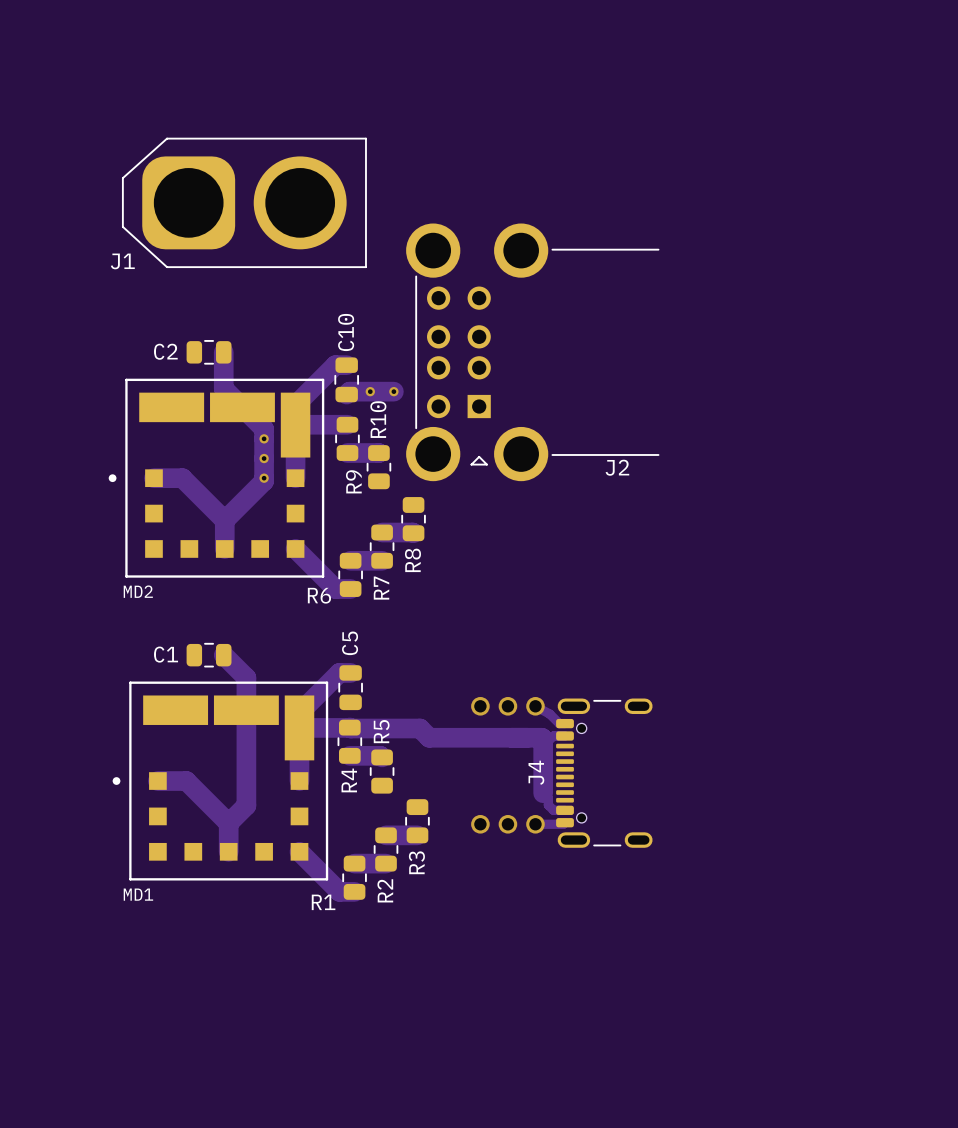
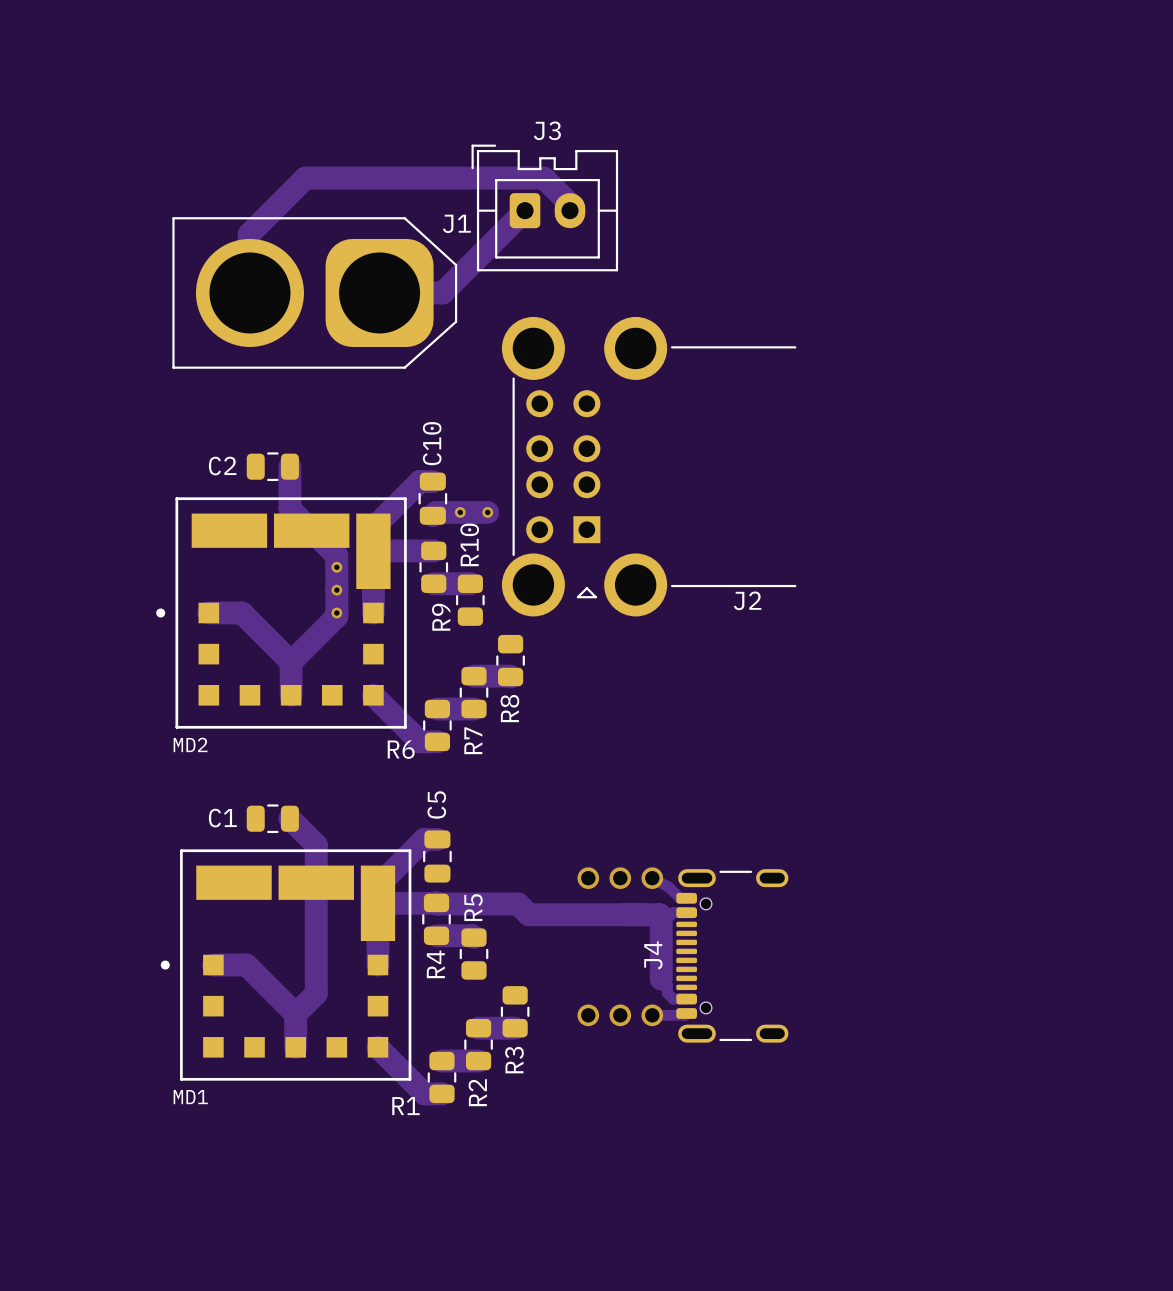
J3: none -> (544, 207)
track: none -> (525, 210) (442, 292) (378, 292)
track: none -> (570, 210) (570, 204) (544, 178) (305, 178) (249, 234) (249, 292)
J1 rotation: 0° (244, 202) -> 180° (314, 292)

